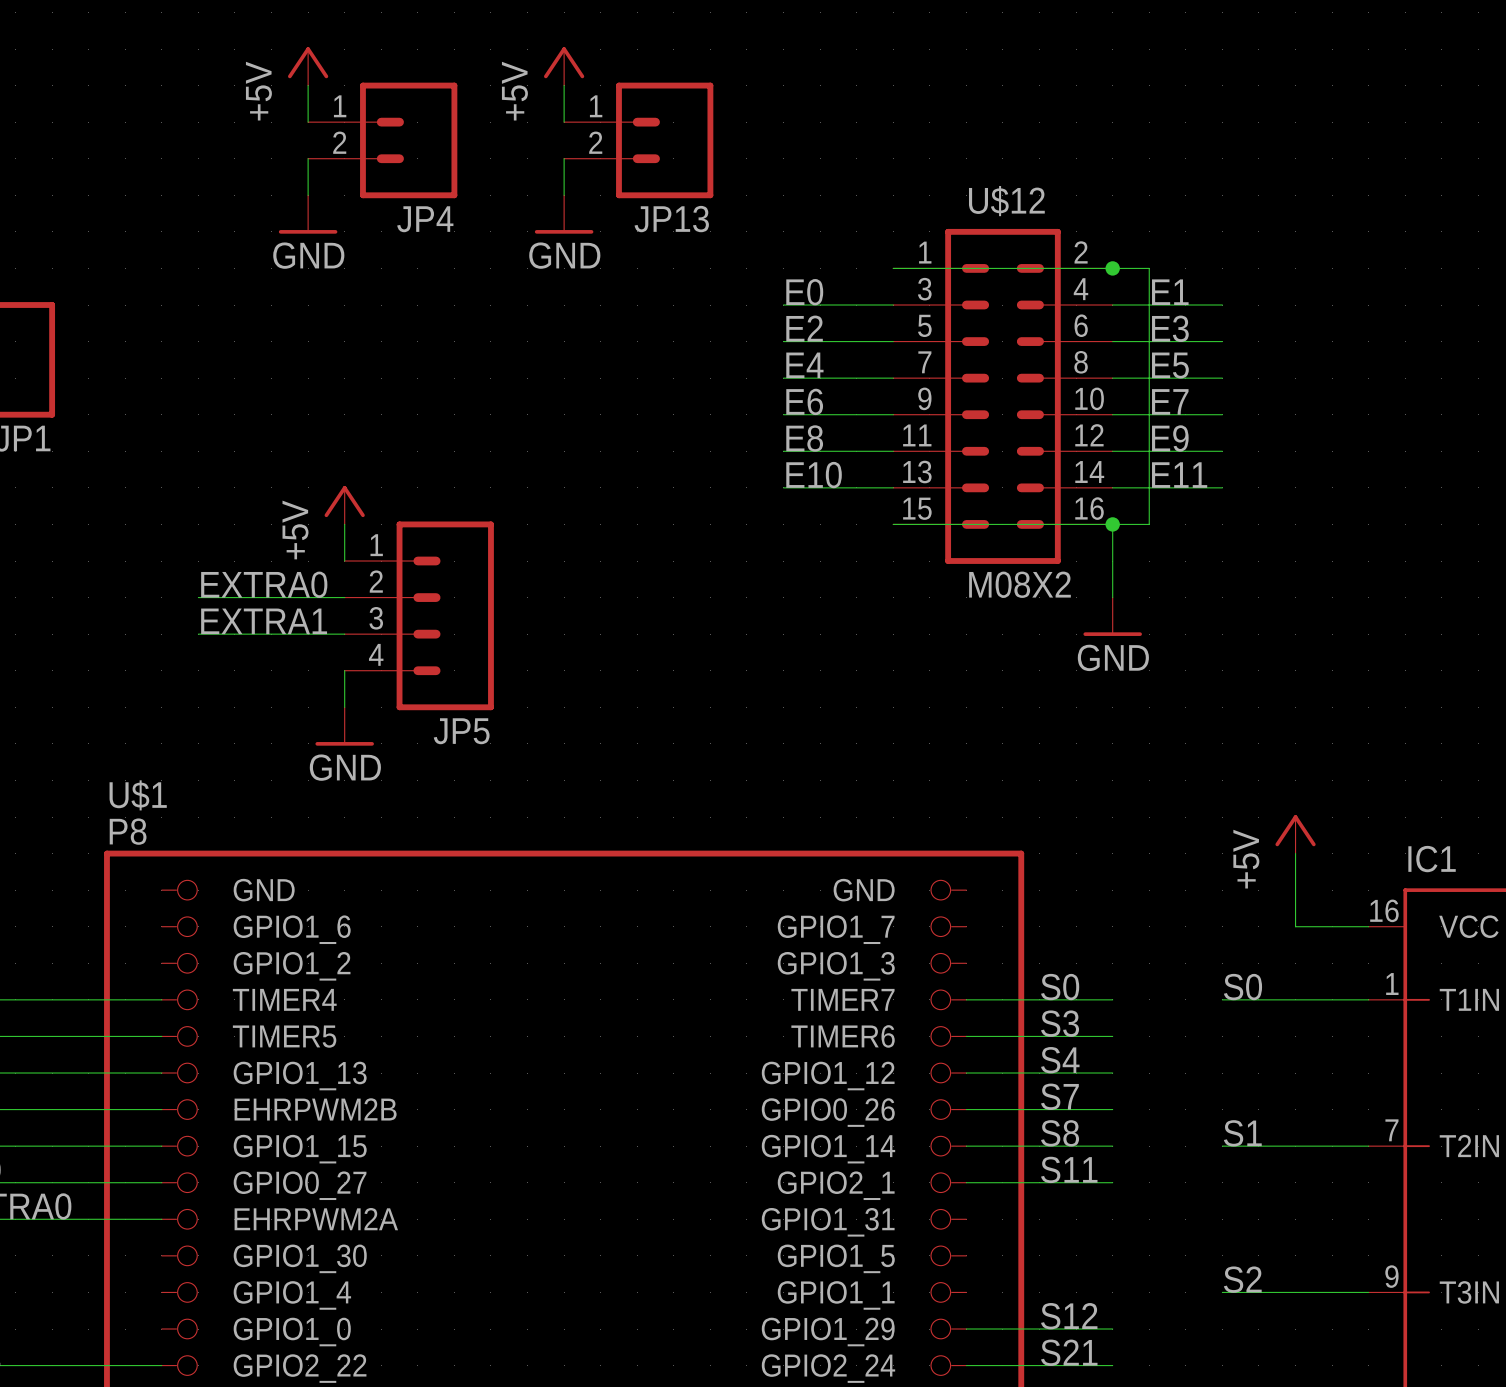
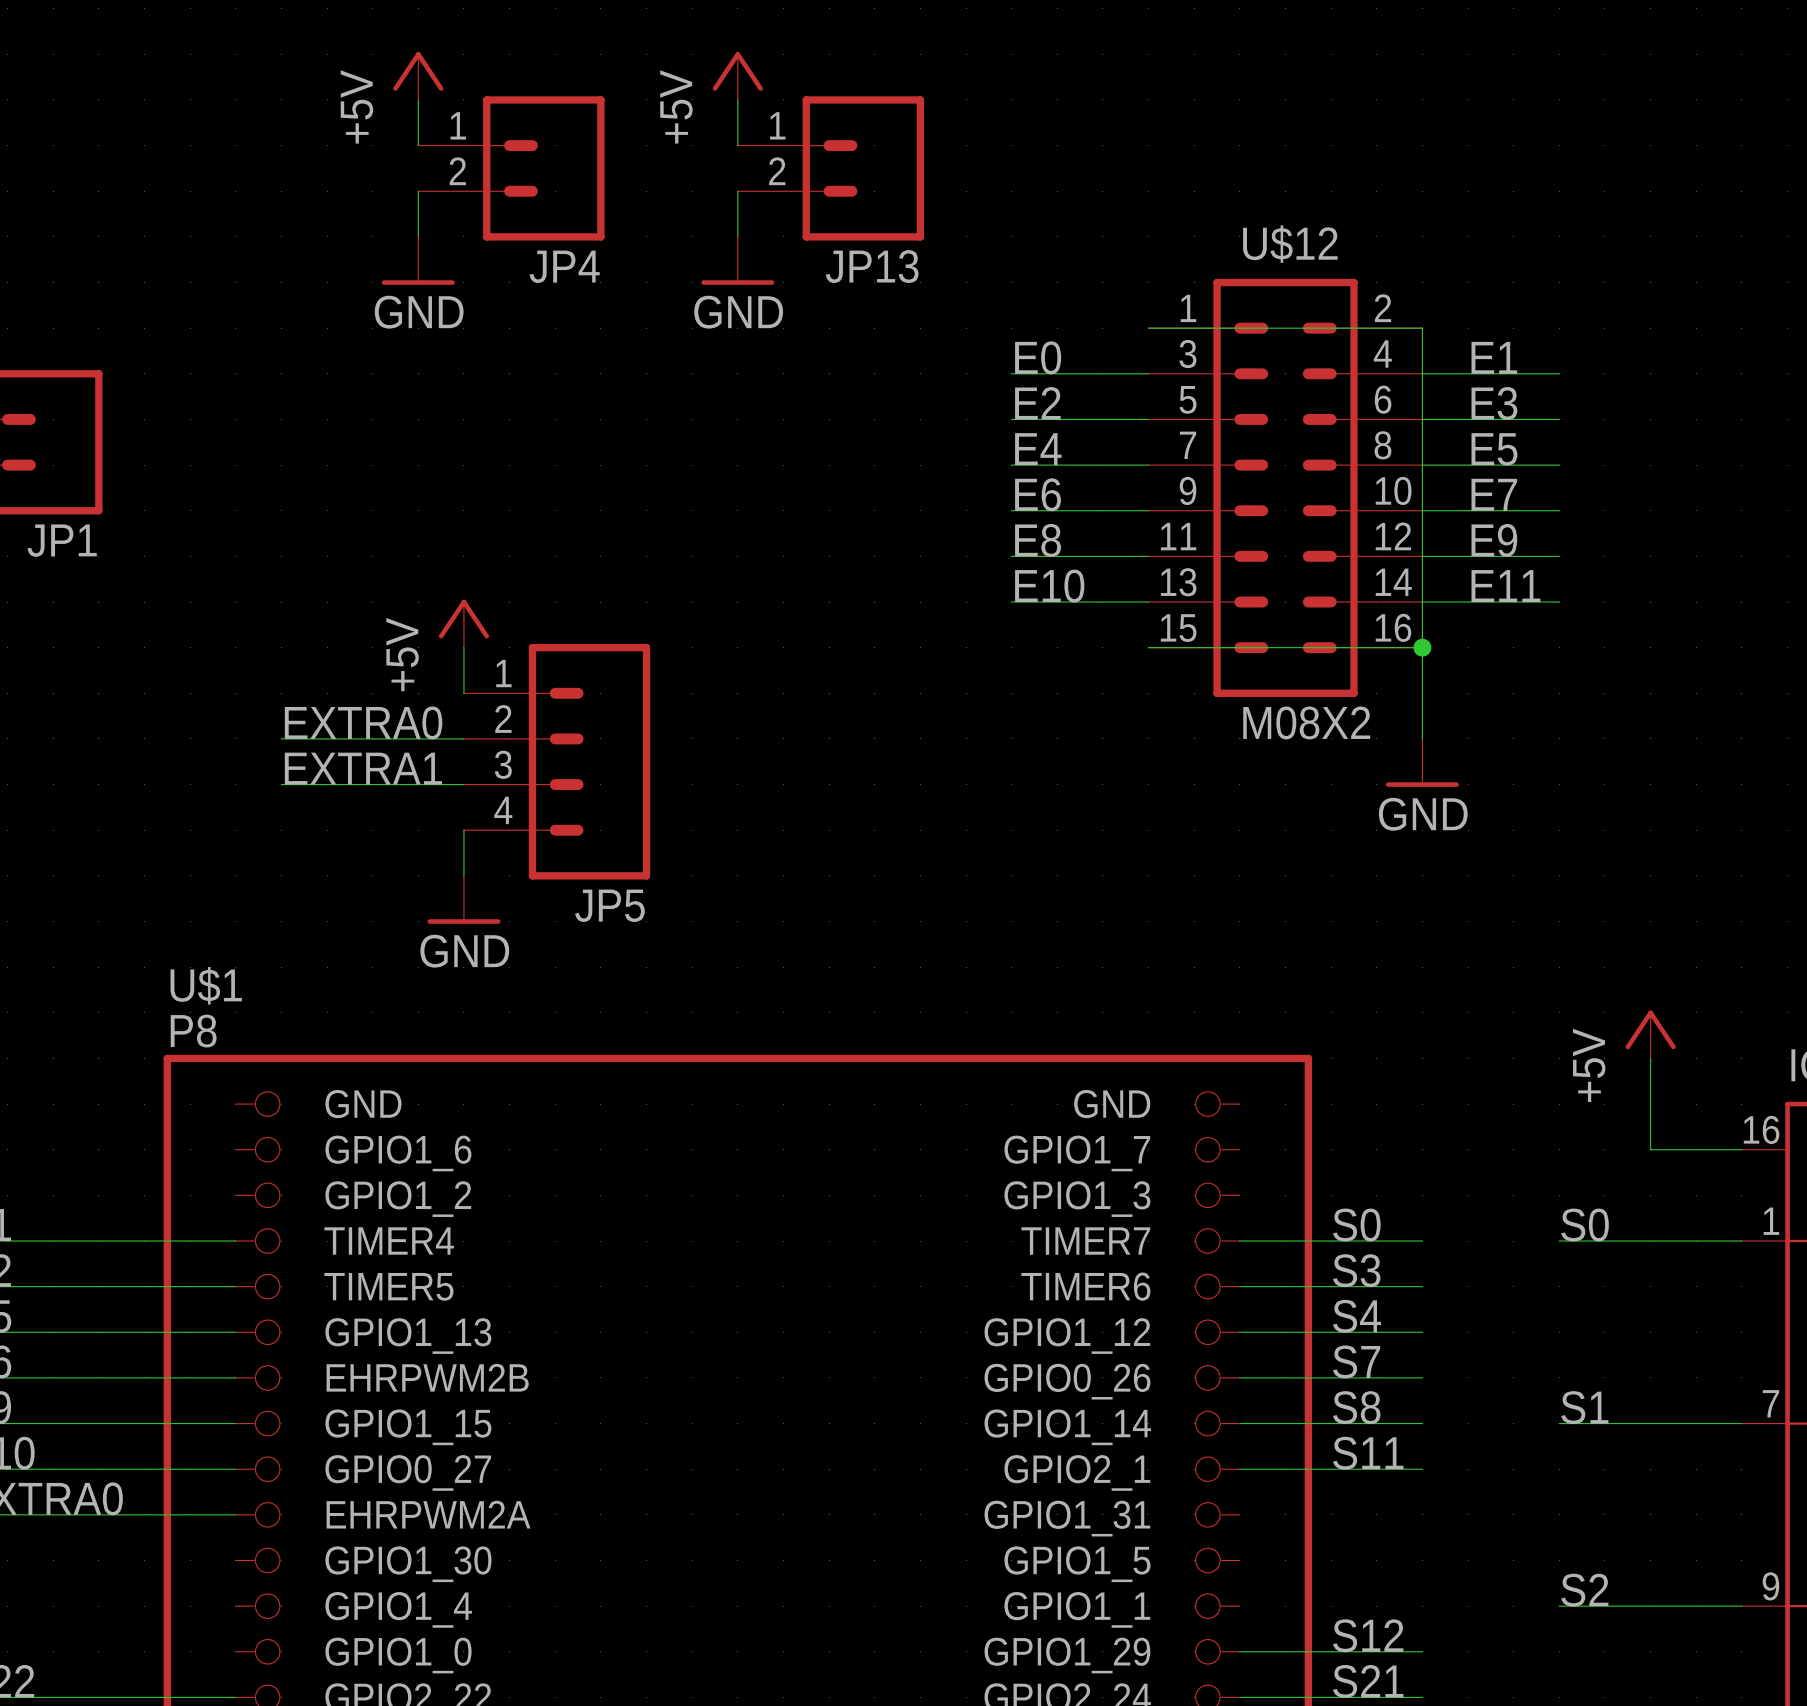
wire: (1112, 268) (1149, 268) (1149, 524) (1112, 524) -> (1422, 328) (1422, 647)
junction: (1112, 268) -> none

